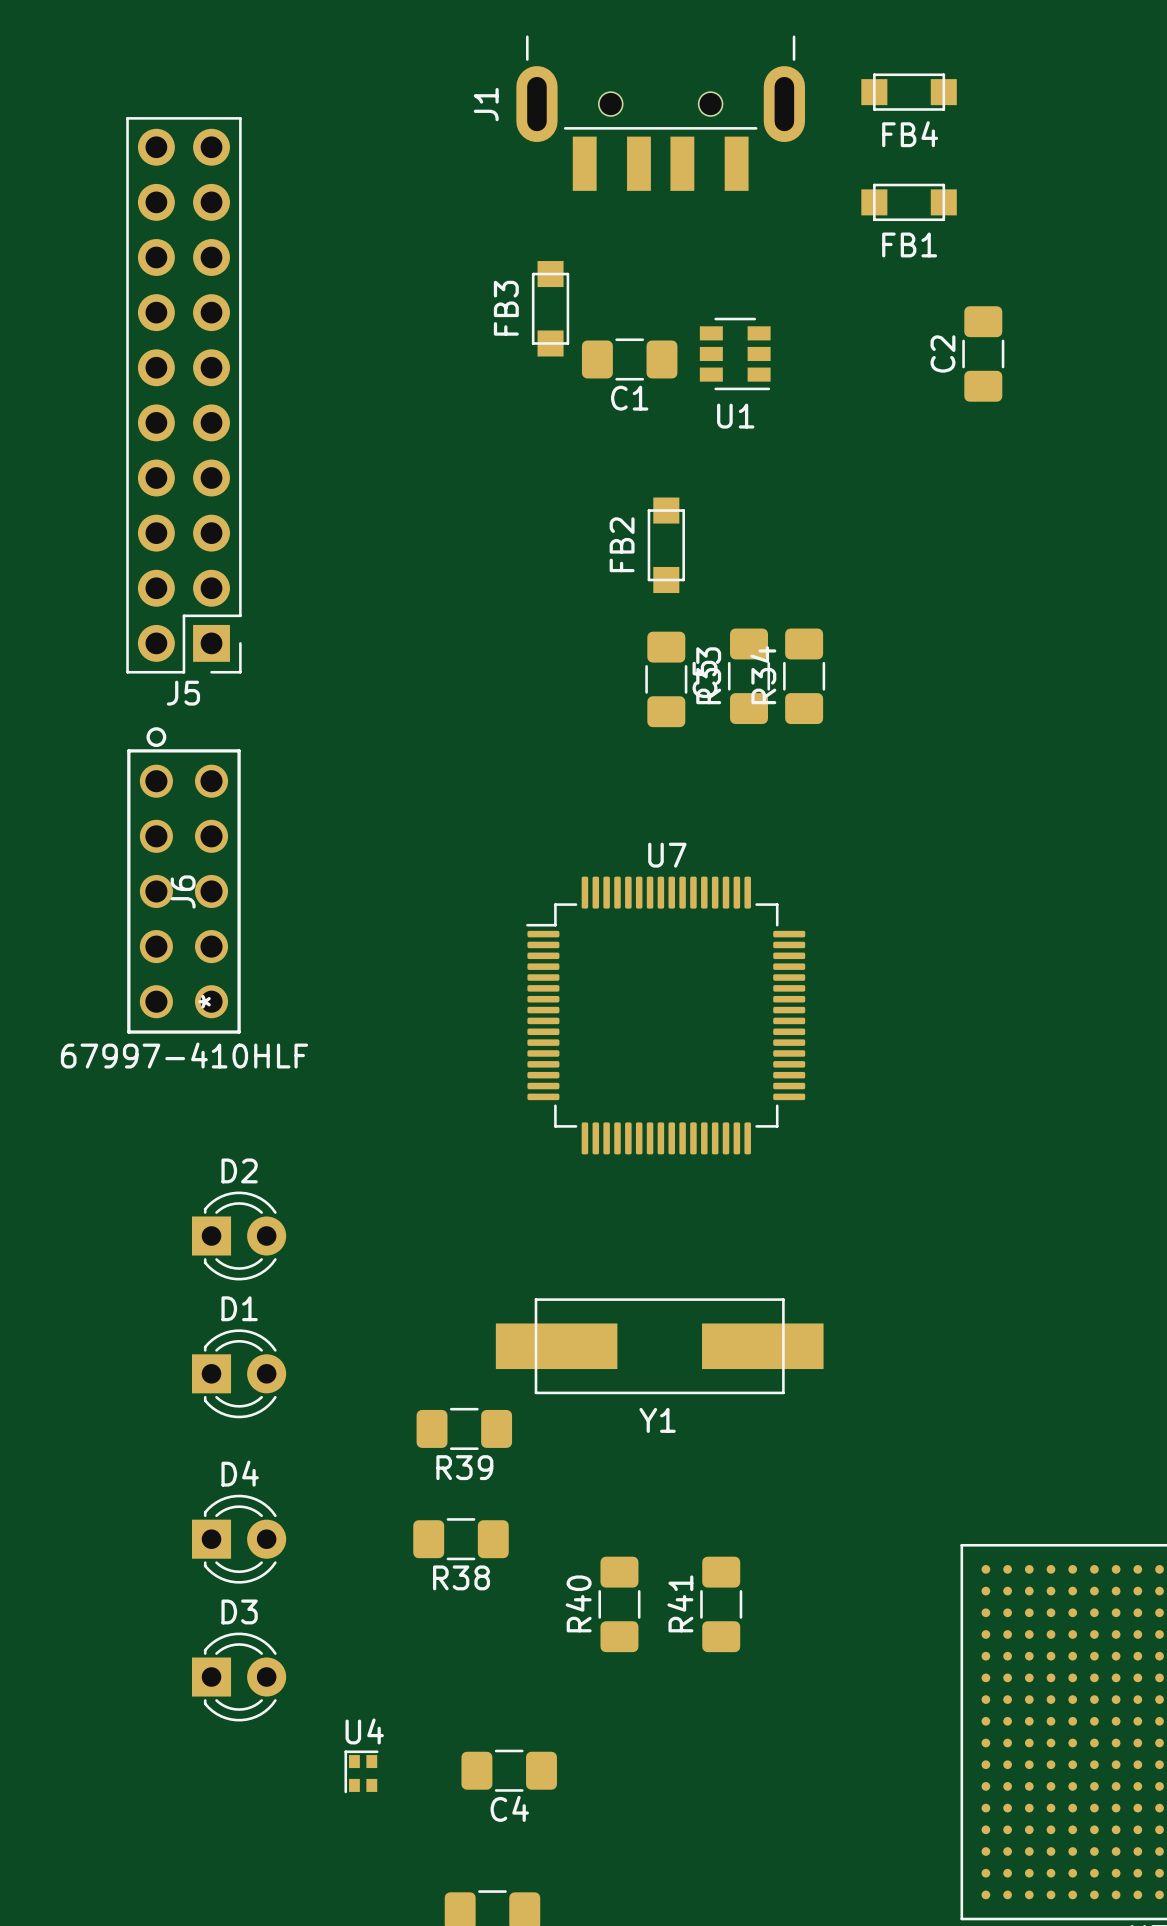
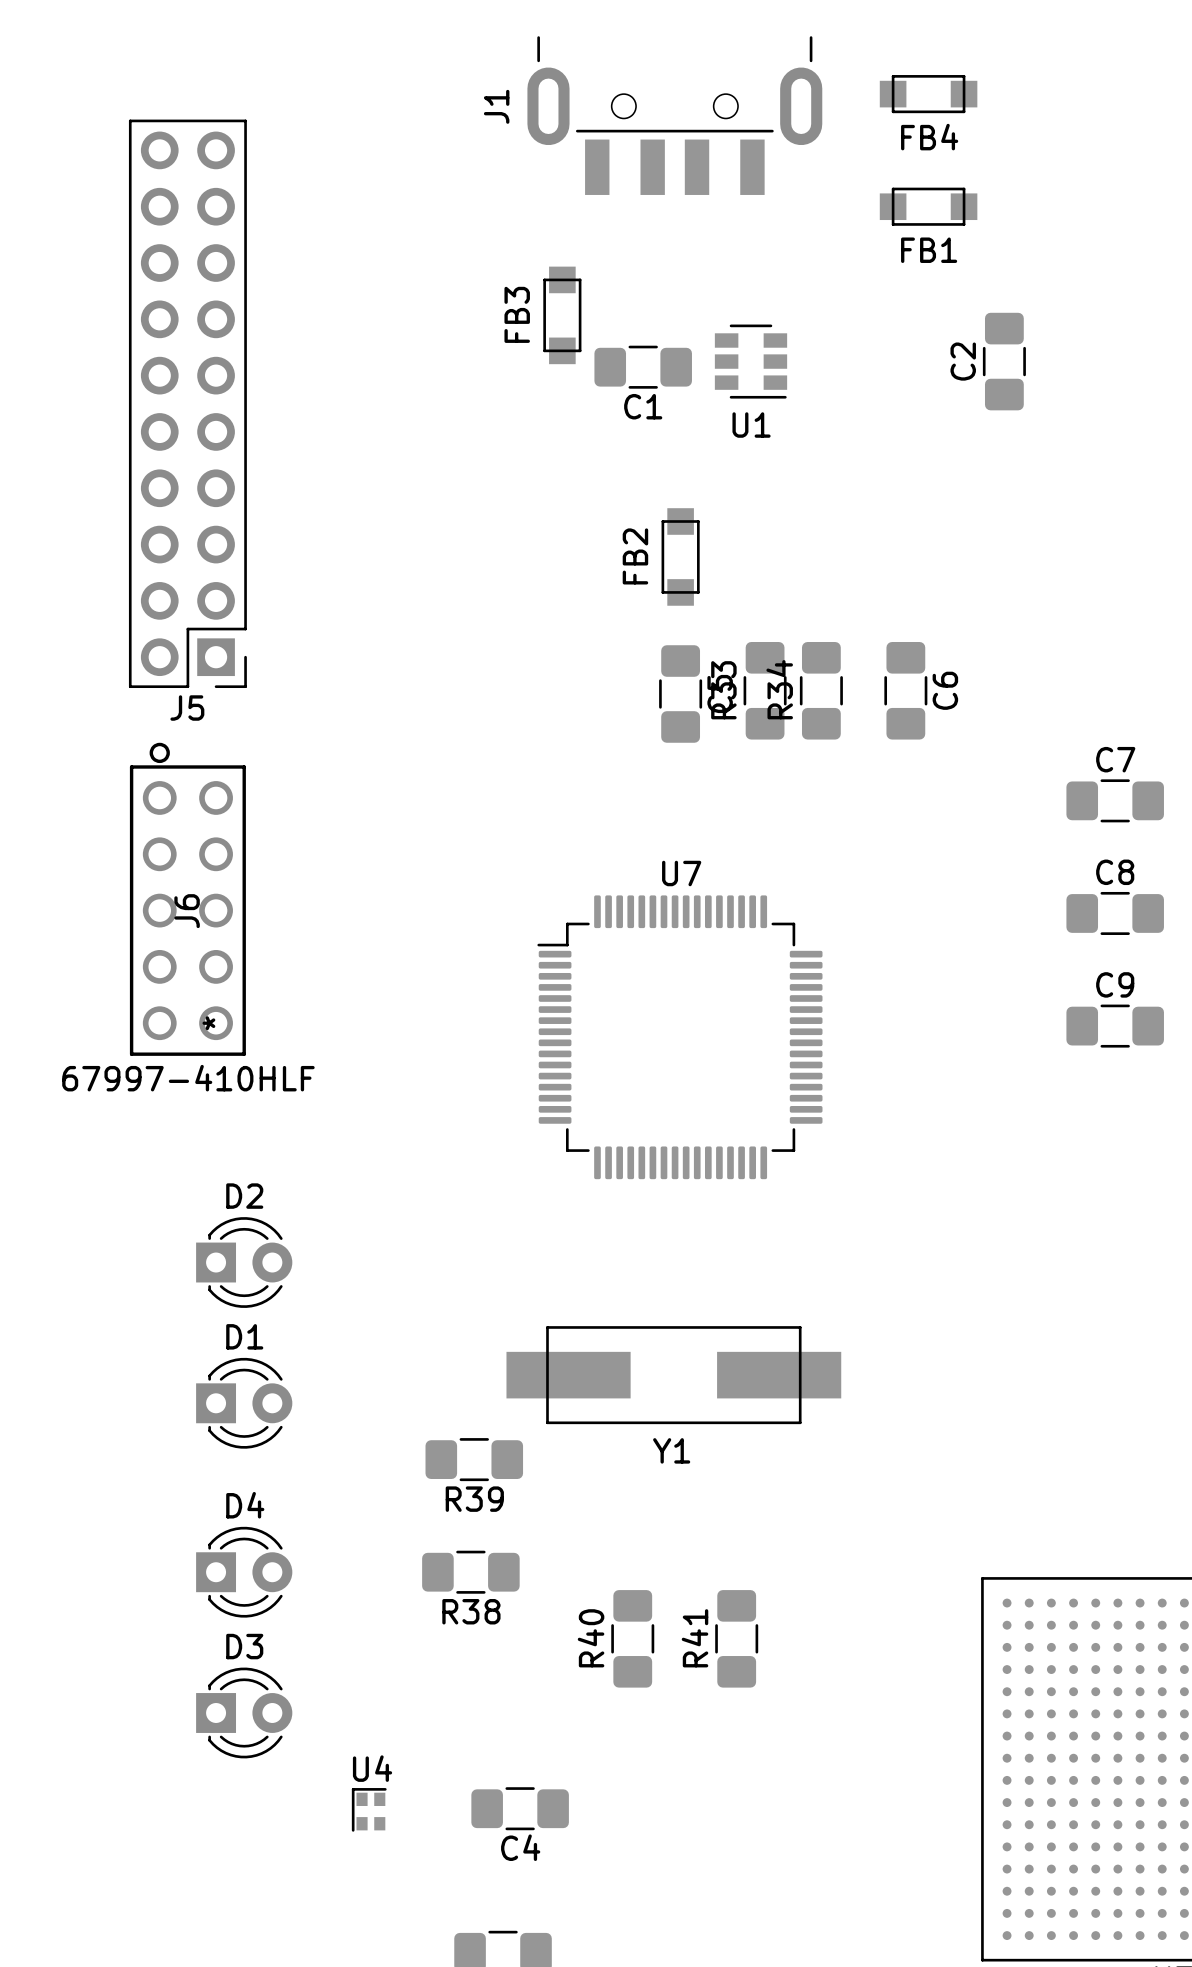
C6: none -> (905, 690)
C7: none -> (1115, 800)
C8: none -> (1115, 913)
C9: none -> (1115, 1026)

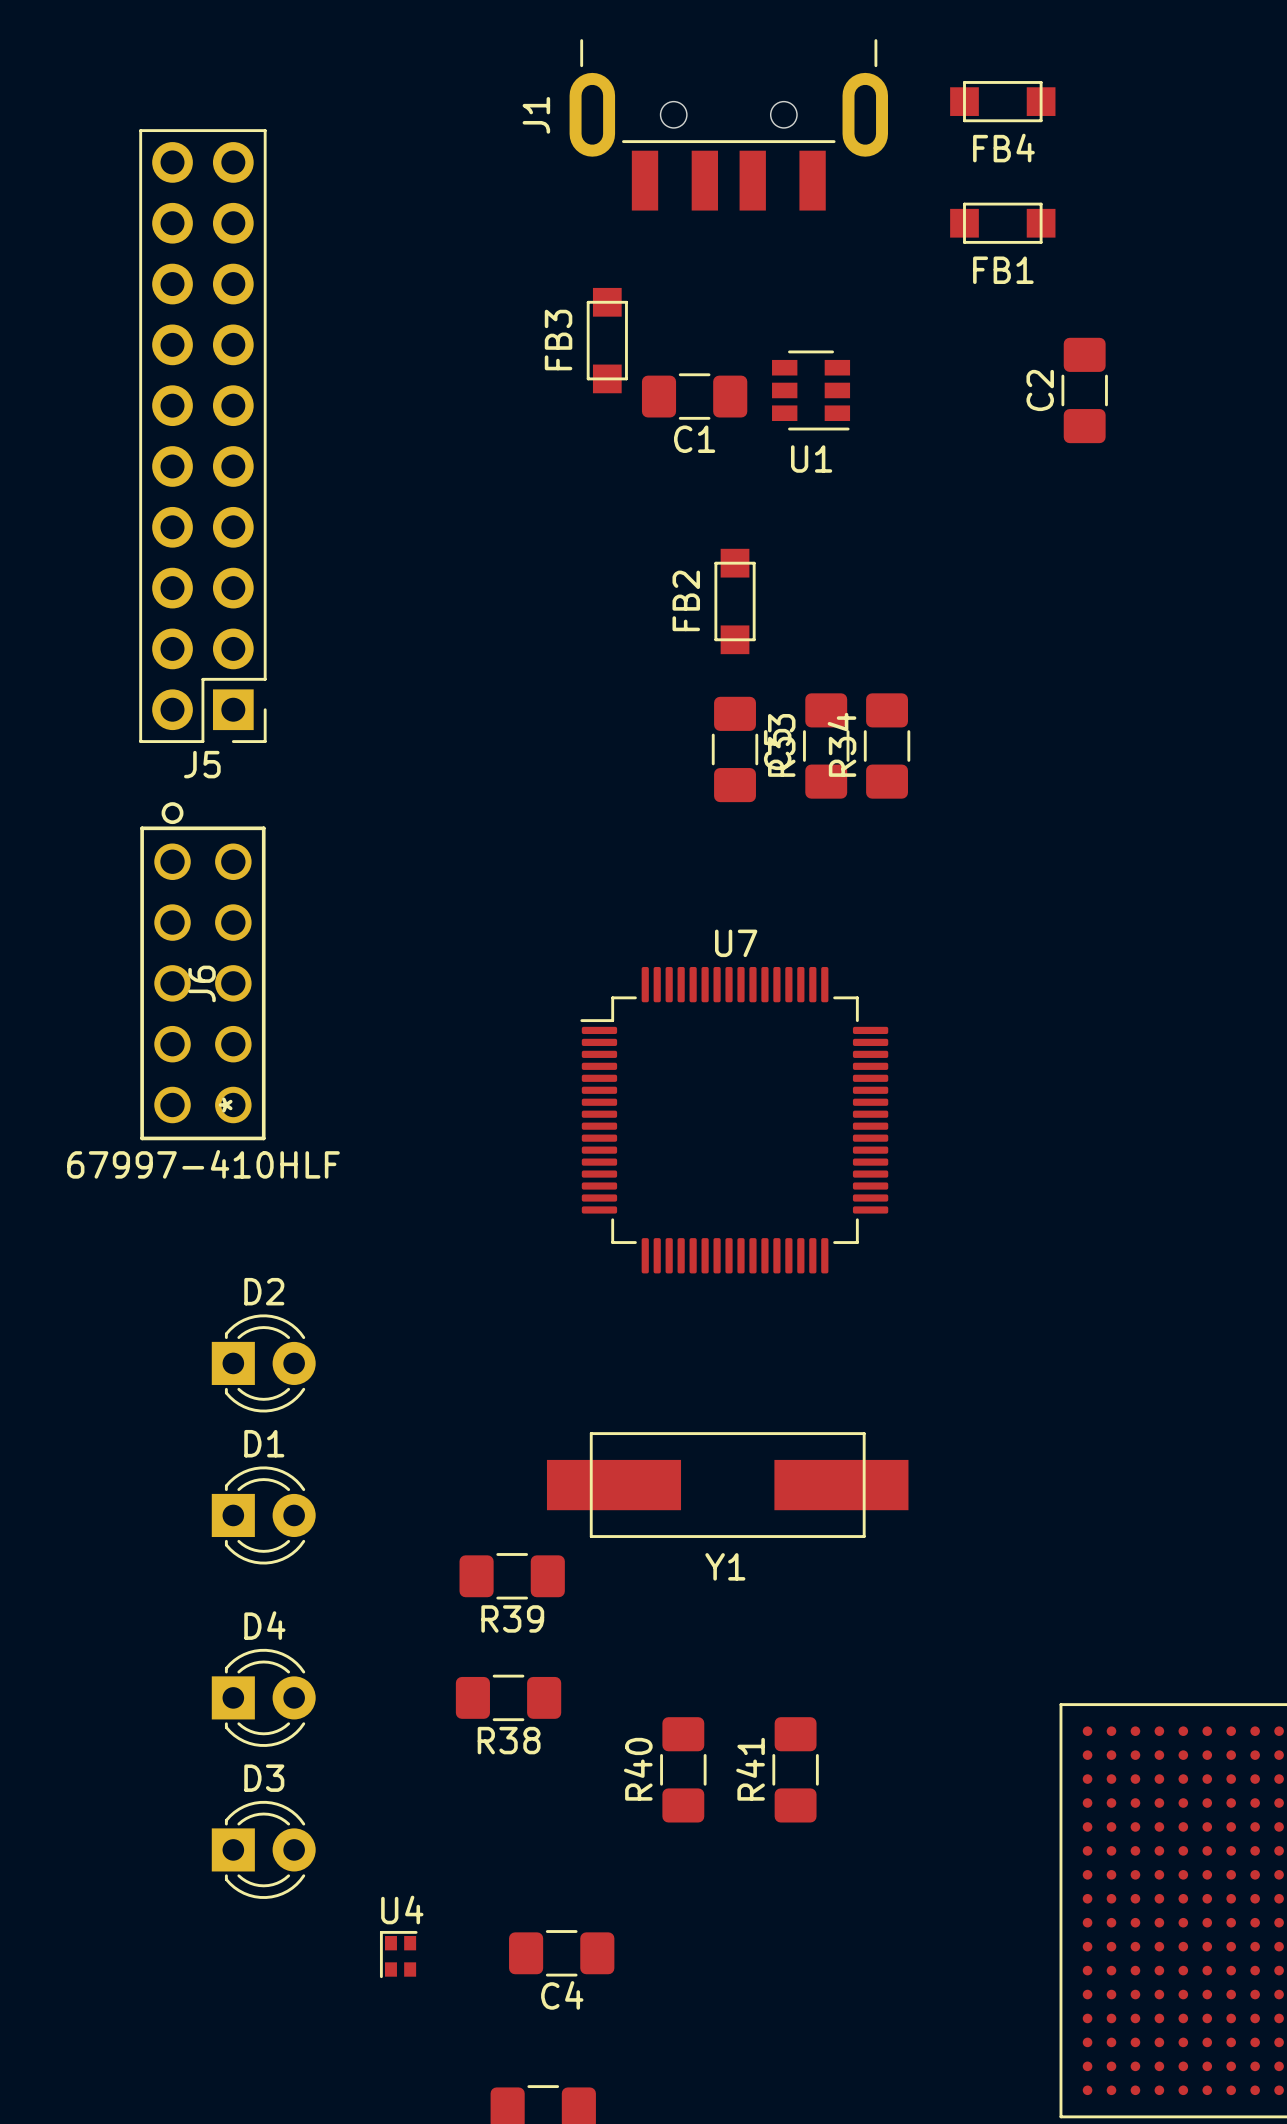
C6: (905, 690) -> none
C7: (1115, 800) -> none
C8: (1115, 913) -> none
C9: (1115, 1026) -> none

